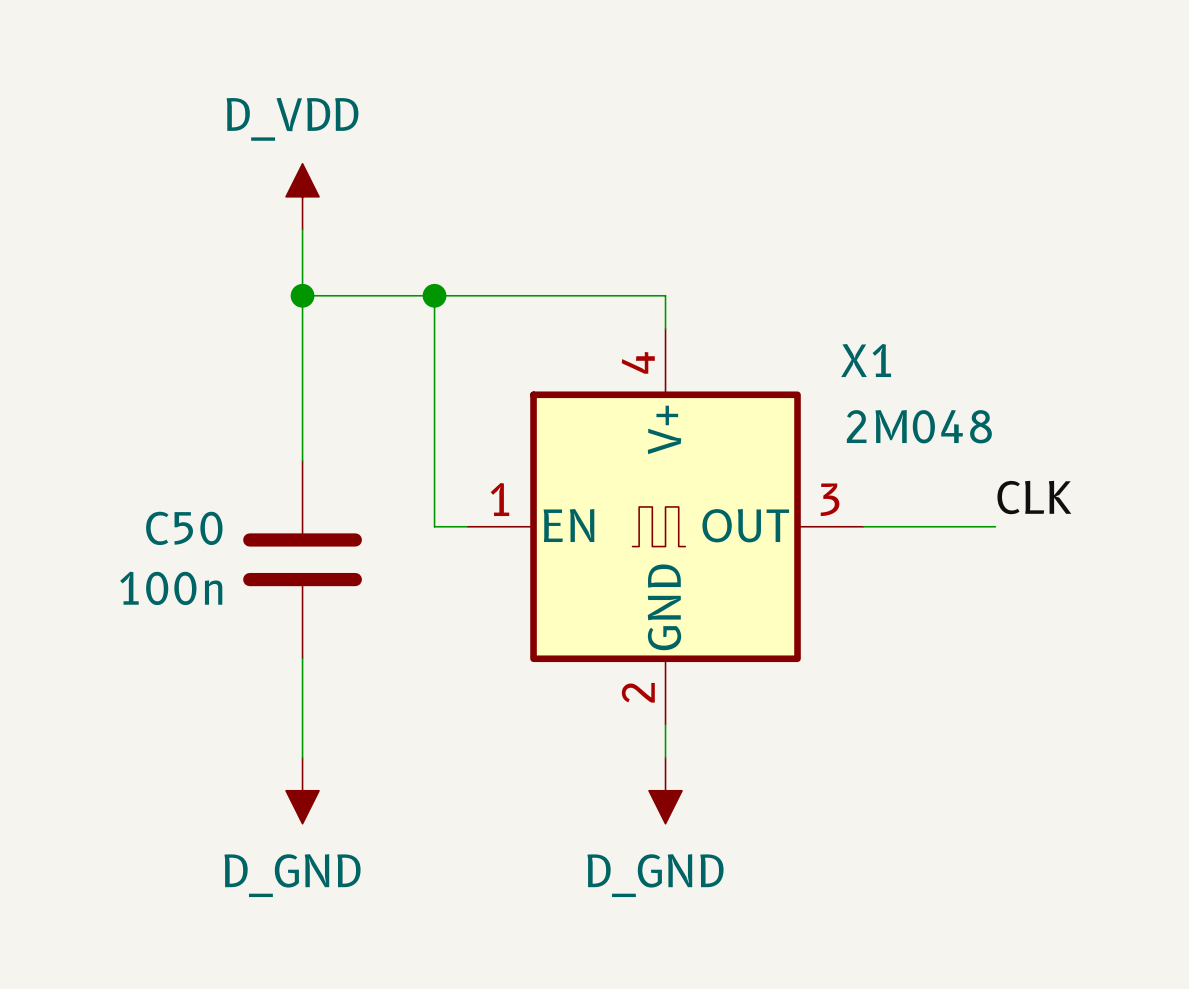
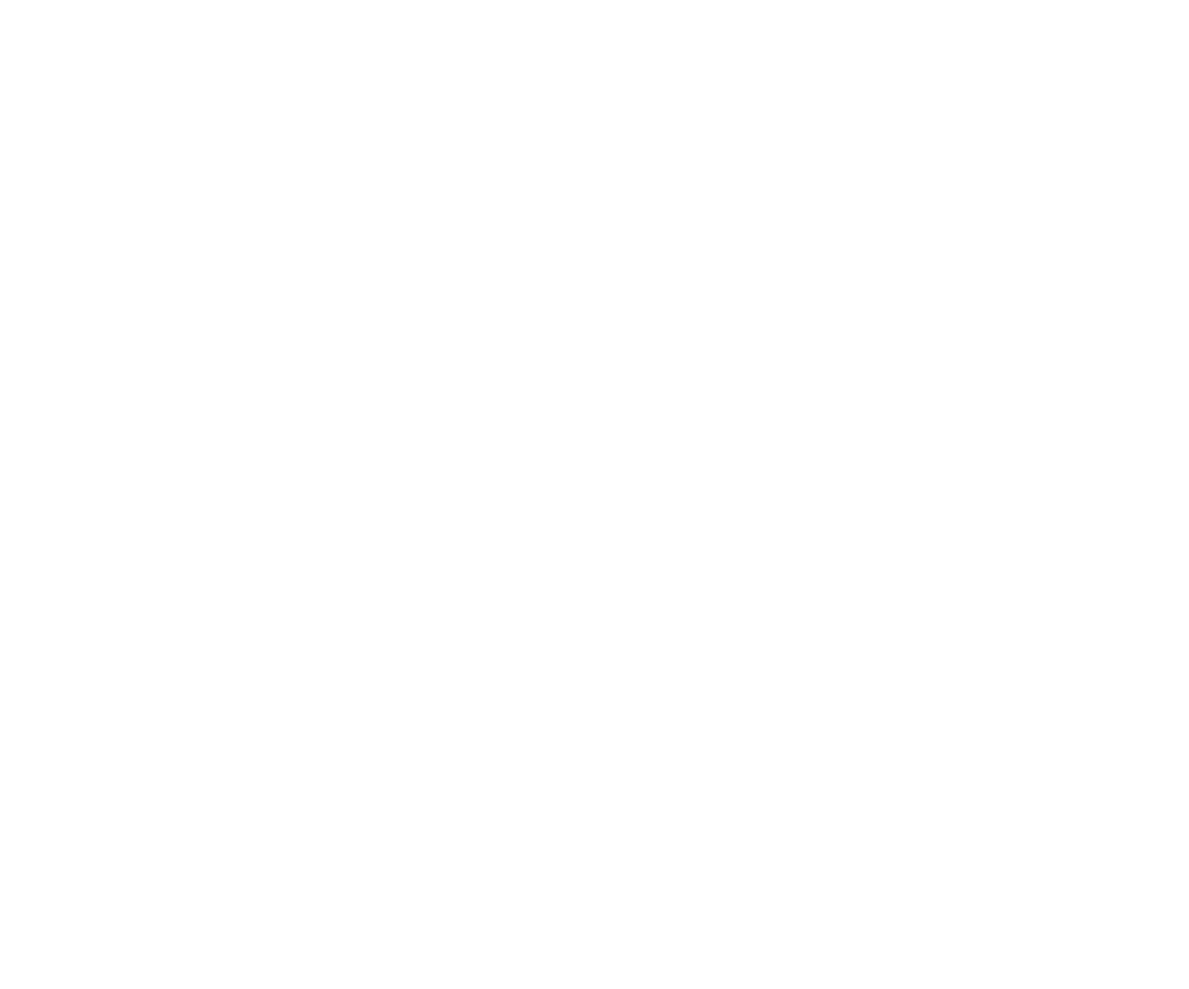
power symbol: D_VDD (302, 196) -> none
wire: (302, 229) (302, 460) -> none
wire: (302, 295) (665, 295) (665, 328) -> none
junction: (302, 295) -> none
wire: (434, 295) (434, 526) (467, 526) -> none
junction: (434, 295) -> none
label: CLK (1034, 497) -> none
X1: 2M048 (665, 526) -> none
wire: (863, 526) (995, 526) -> none
C50: 100n (302, 559) -> none
wire: (302, 658) (302, 757) -> none
wire: (665, 724) (665, 757) -> none
power symbol: D_GND (302, 790) -> none
power symbol: D_GND (665, 790) -> none

